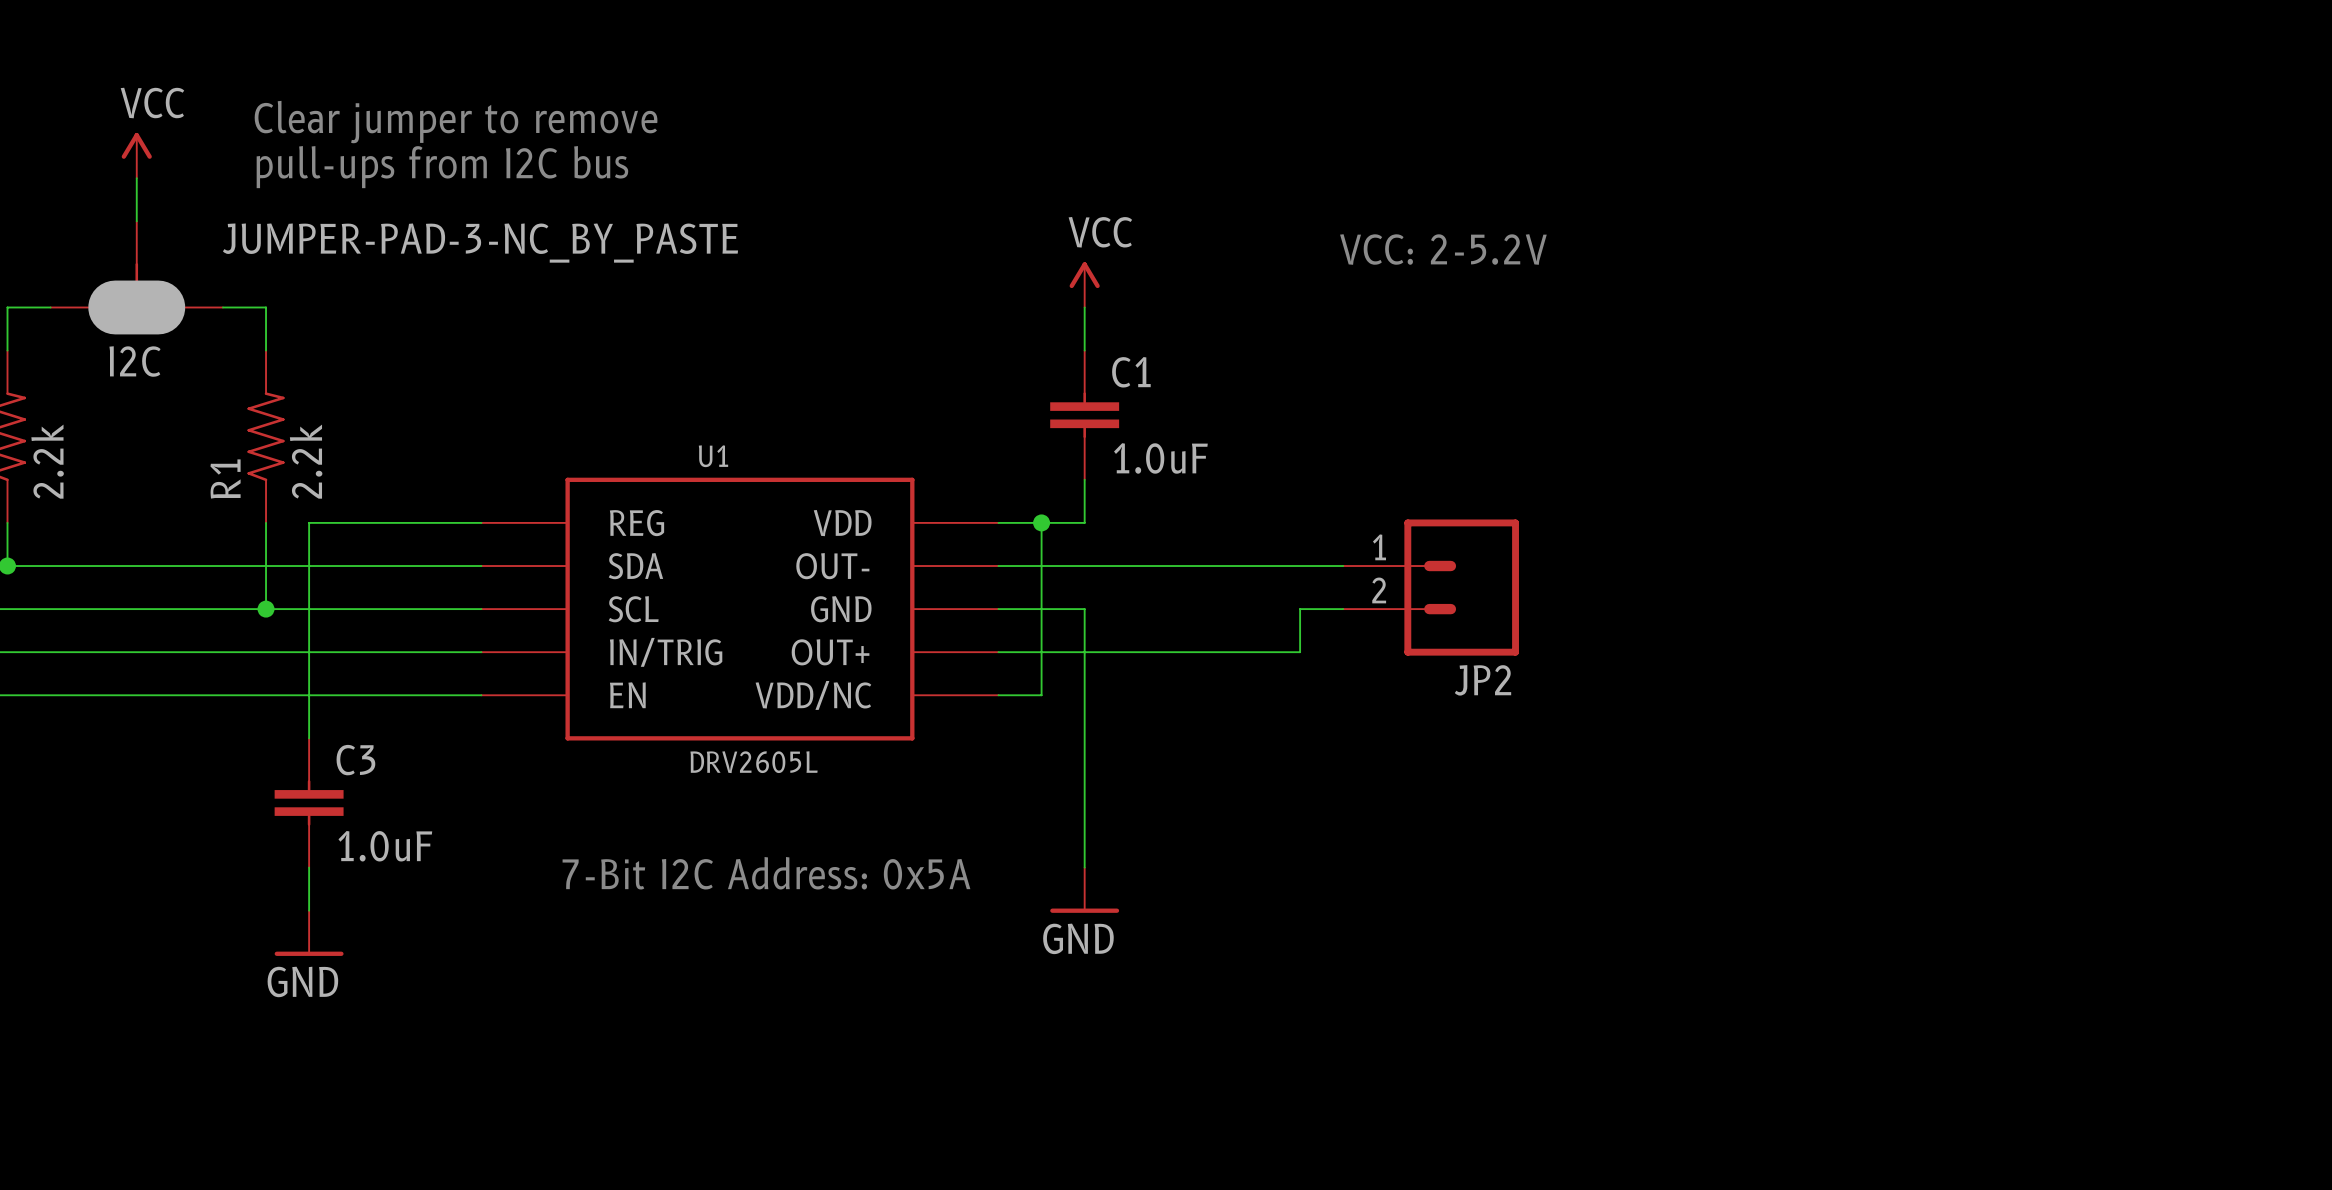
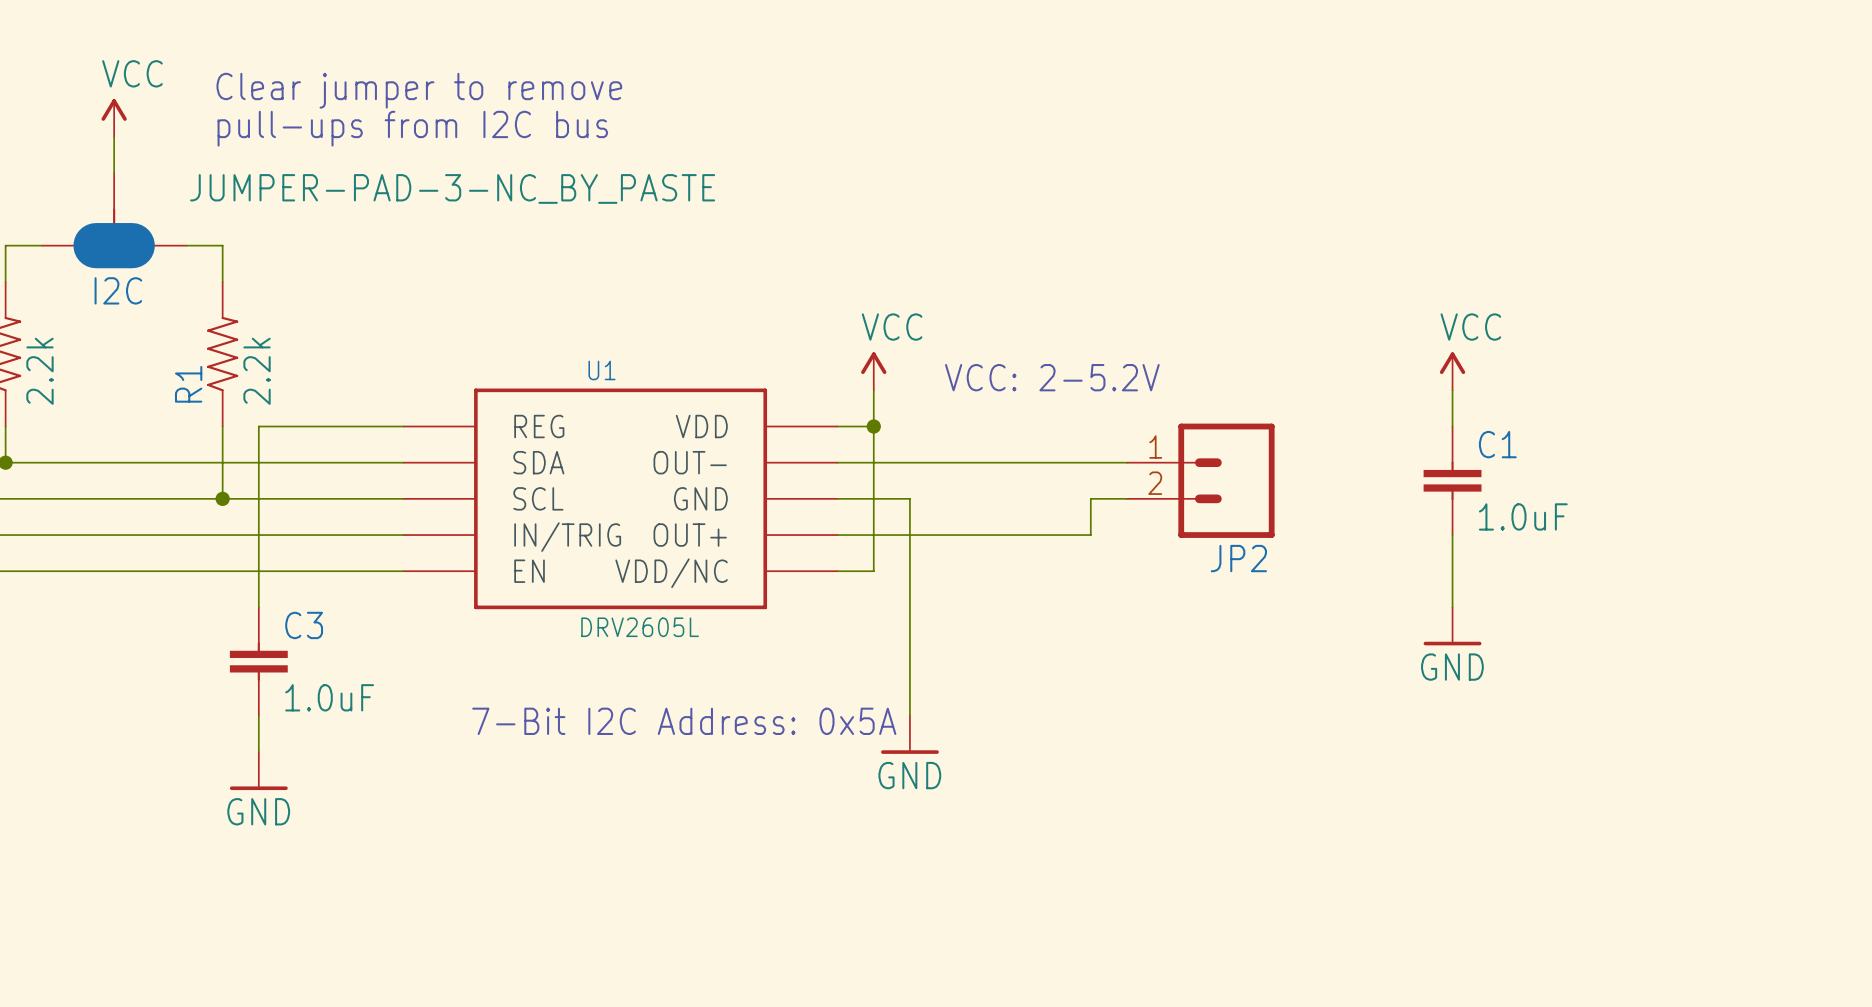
text position: VCC: 2-5.2V (1443, 249) -> VCC: 2-5.2V (1052, 377)
power symbol position: VCC (1084, 284) -> VCC (873, 371)
wire: (1084, 307) (1084, 350) -> none
C1 position: (1084, 415) -> (1452, 480)
power symbol: none -> VCC (1452, 371)
wire: (1084, 479) (1084, 522) (1041, 522) -> (873, 390) (873, 426)
wire: none -> (1452, 390) (1452, 426)
wire: none -> (1452, 535) (1452, 607)
power symbol: none -> GND (1452, 626)

